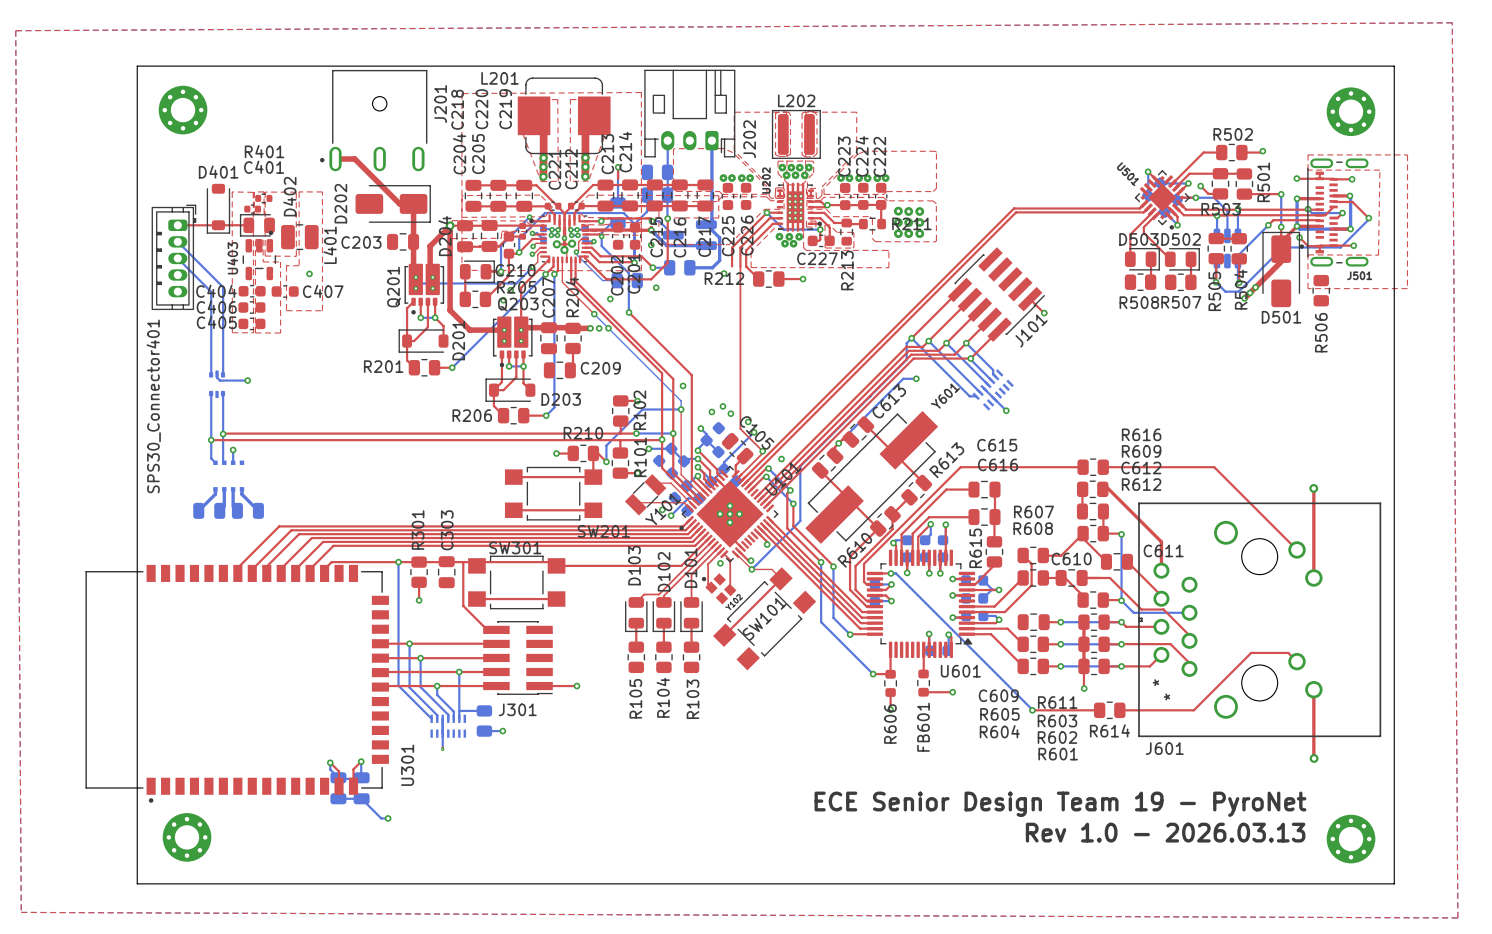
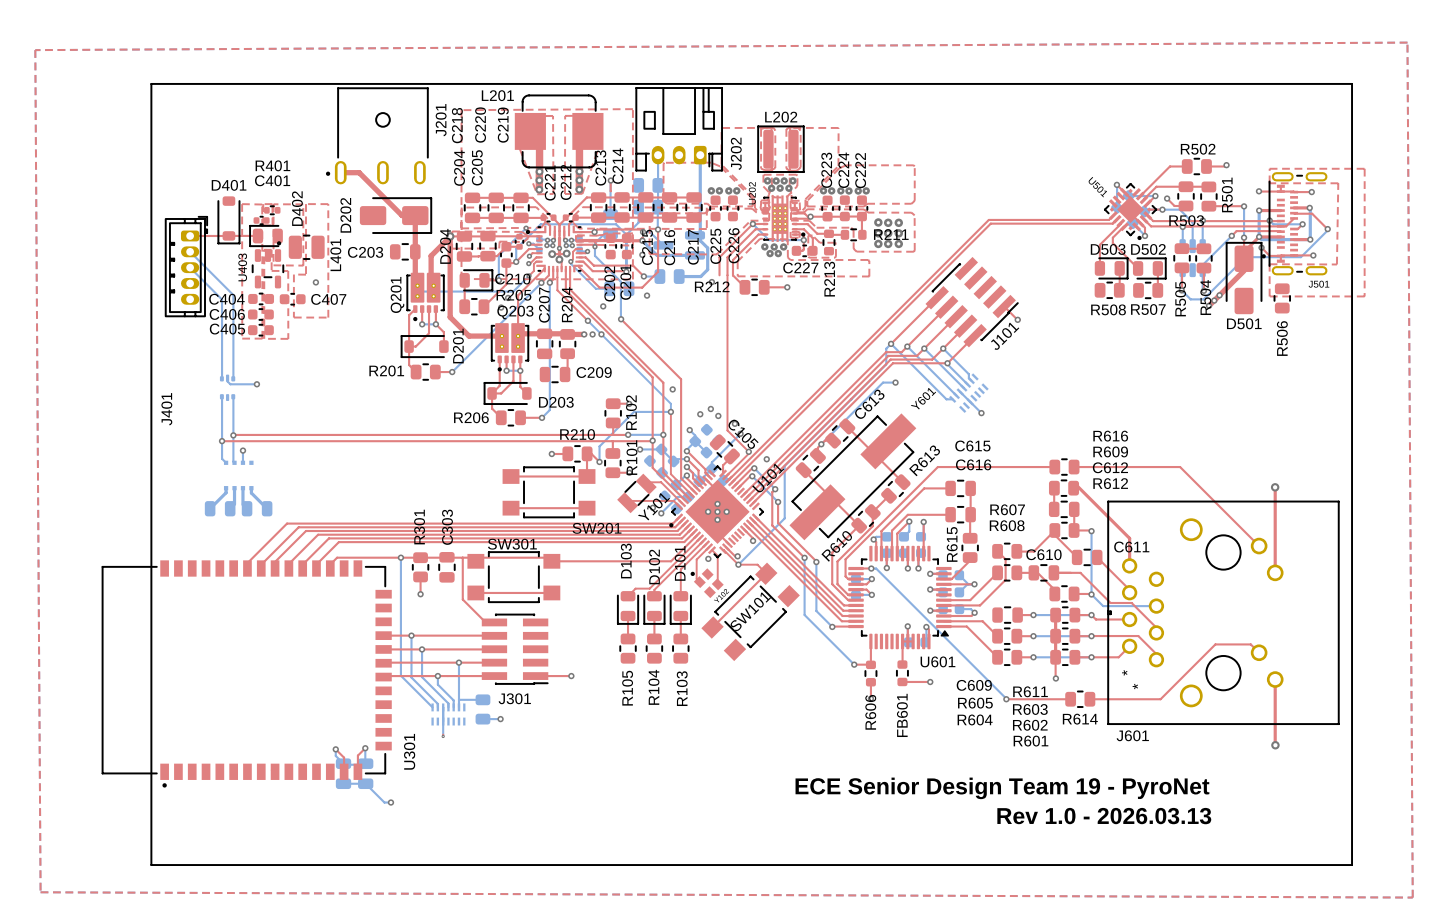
part: (183, 110) -> none
part: (1351, 111) -> none
SPS30_Connector401 name: SPS30_Connector401 (153, 406) -> J401 (166, 409)
part: (187, 837) -> none
part: (1351, 839) -> none

